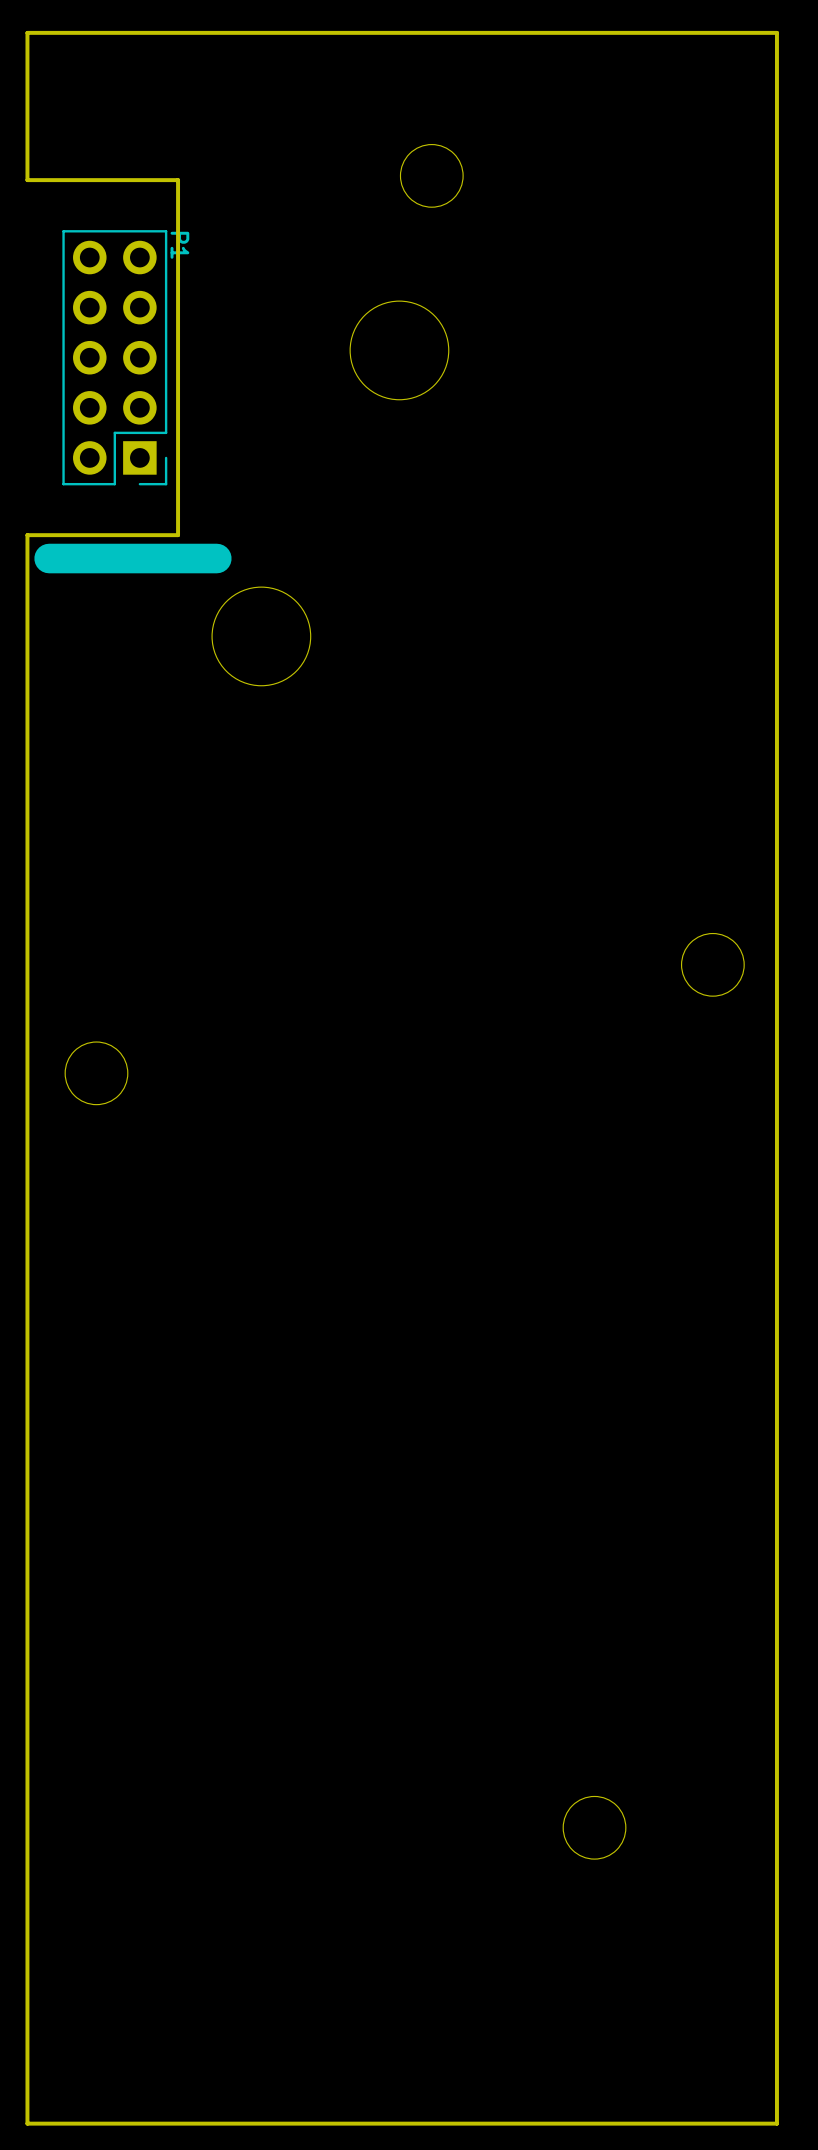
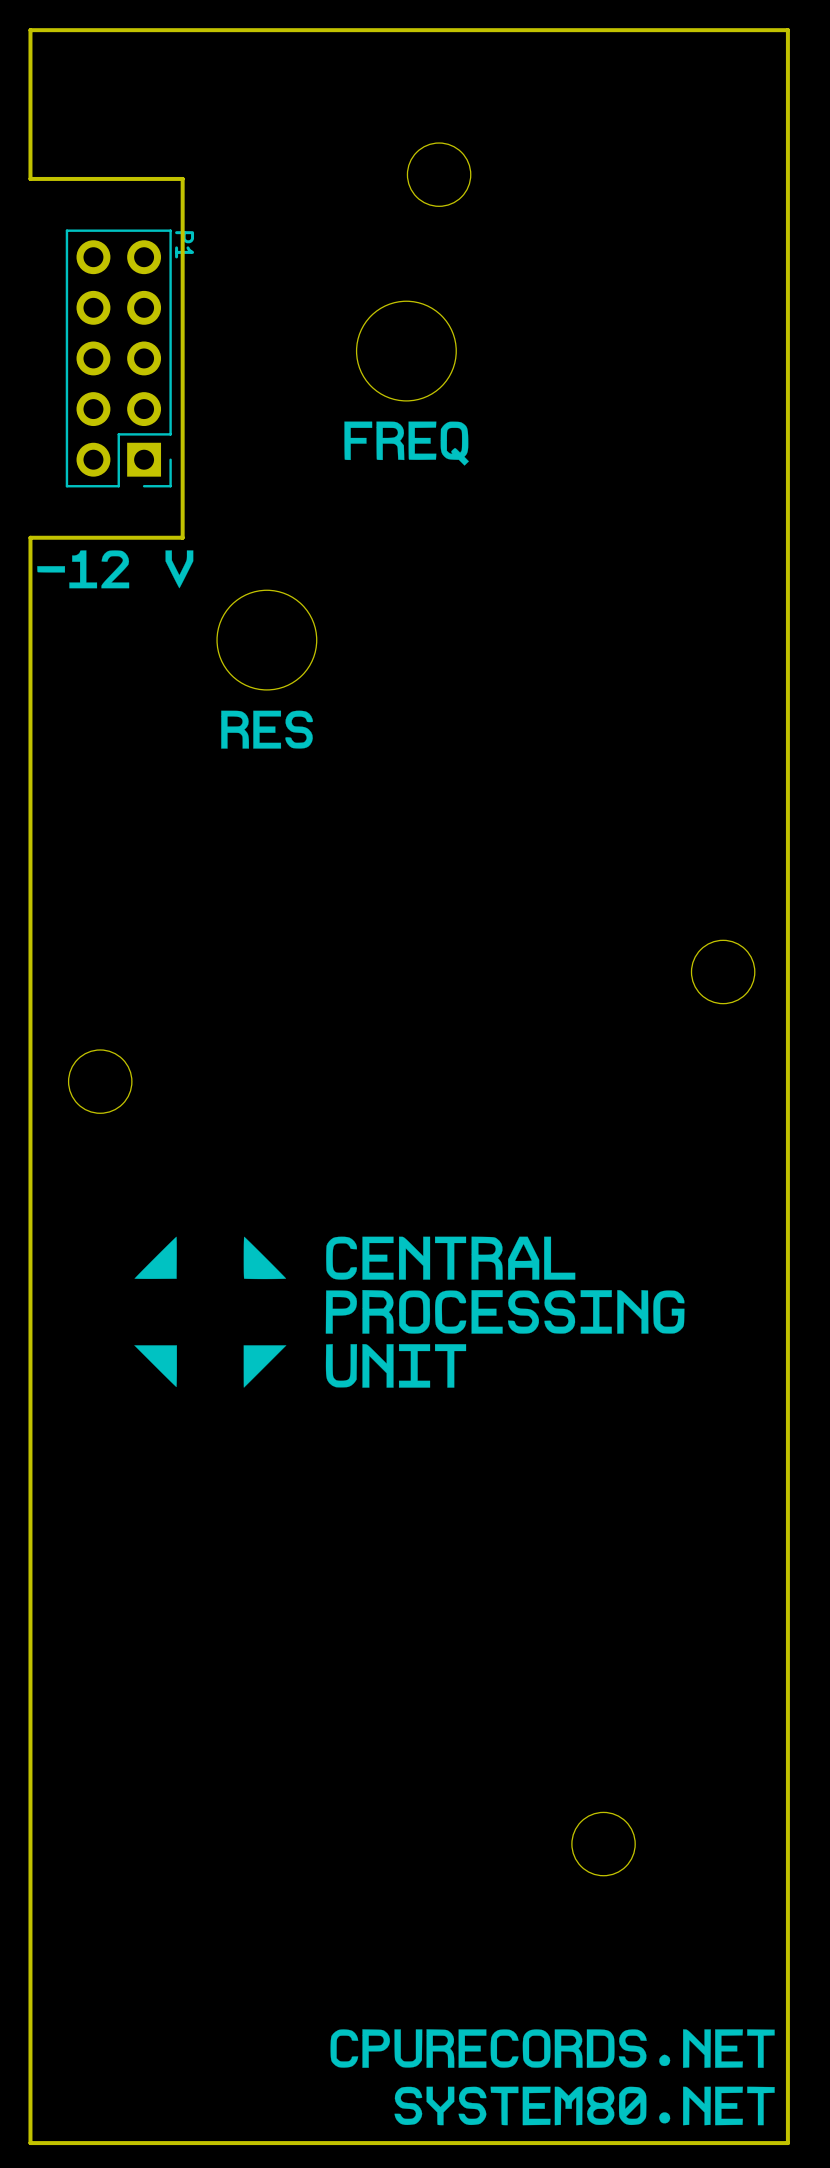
drawing: none -> [37, 421, 775, 2126]
line: (216, 558) (49, 558) -> none

